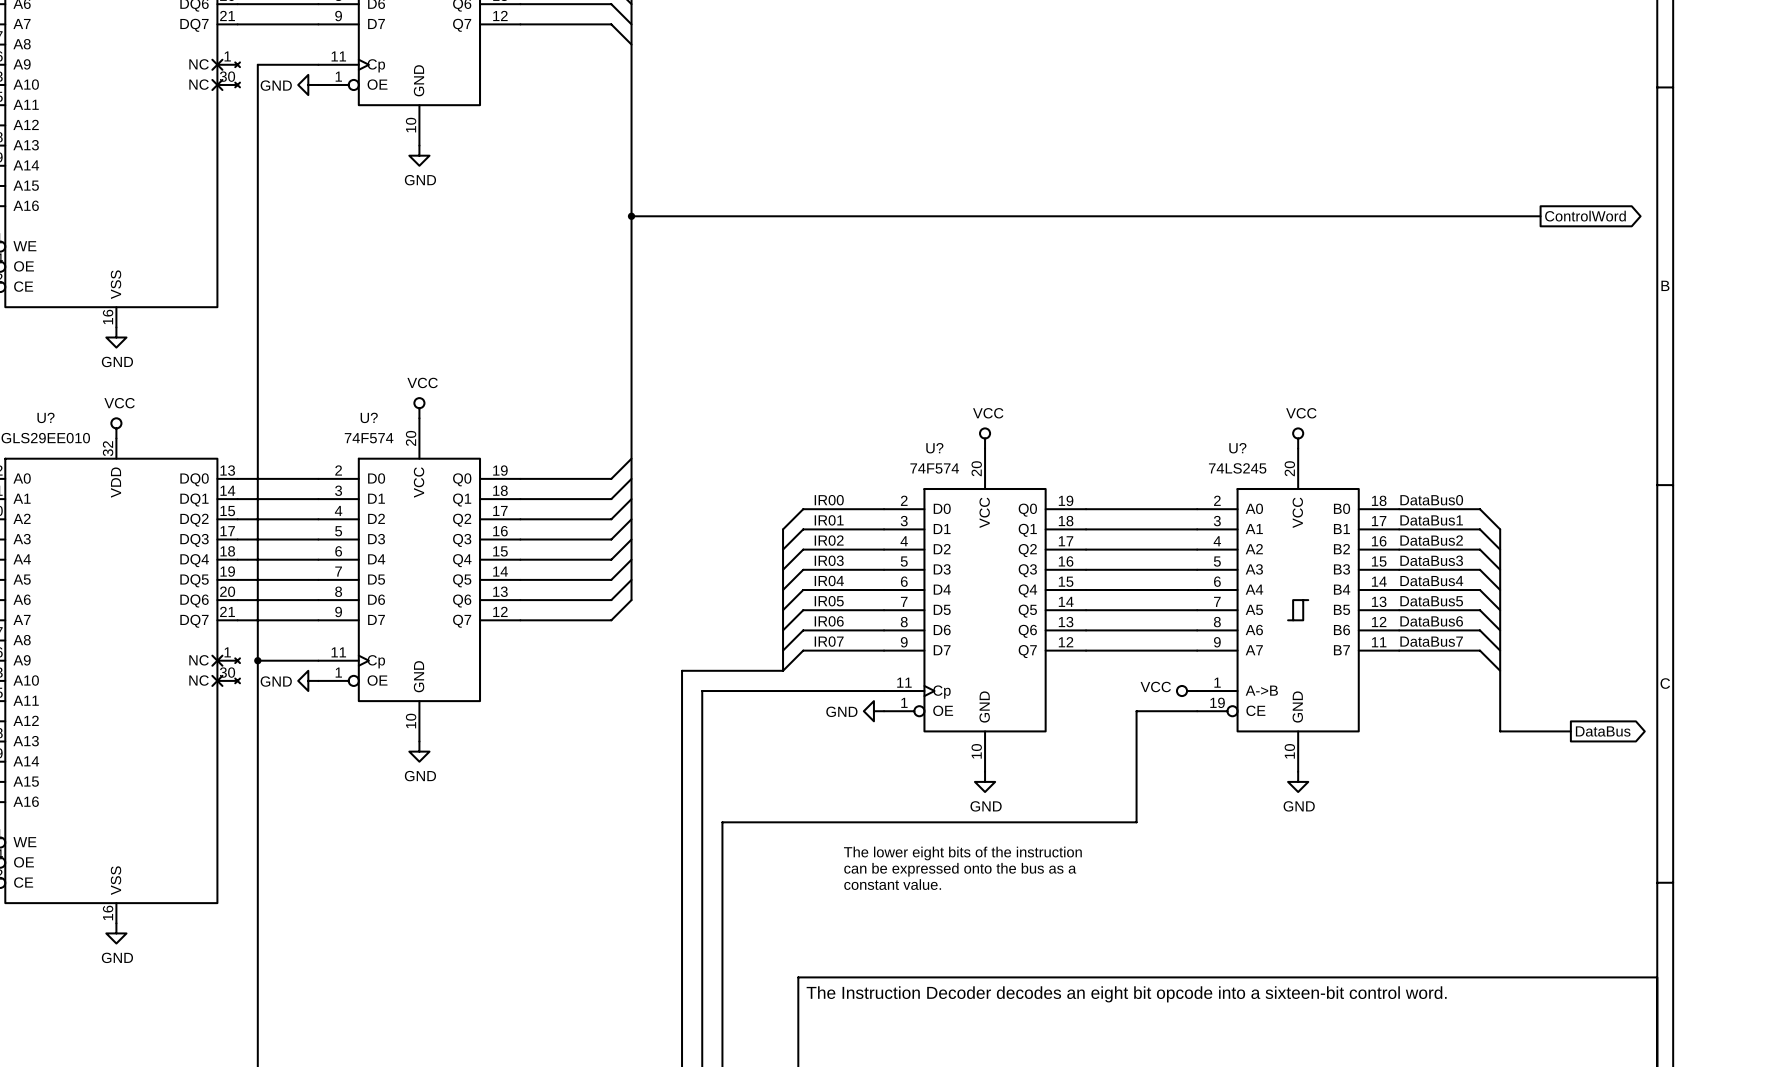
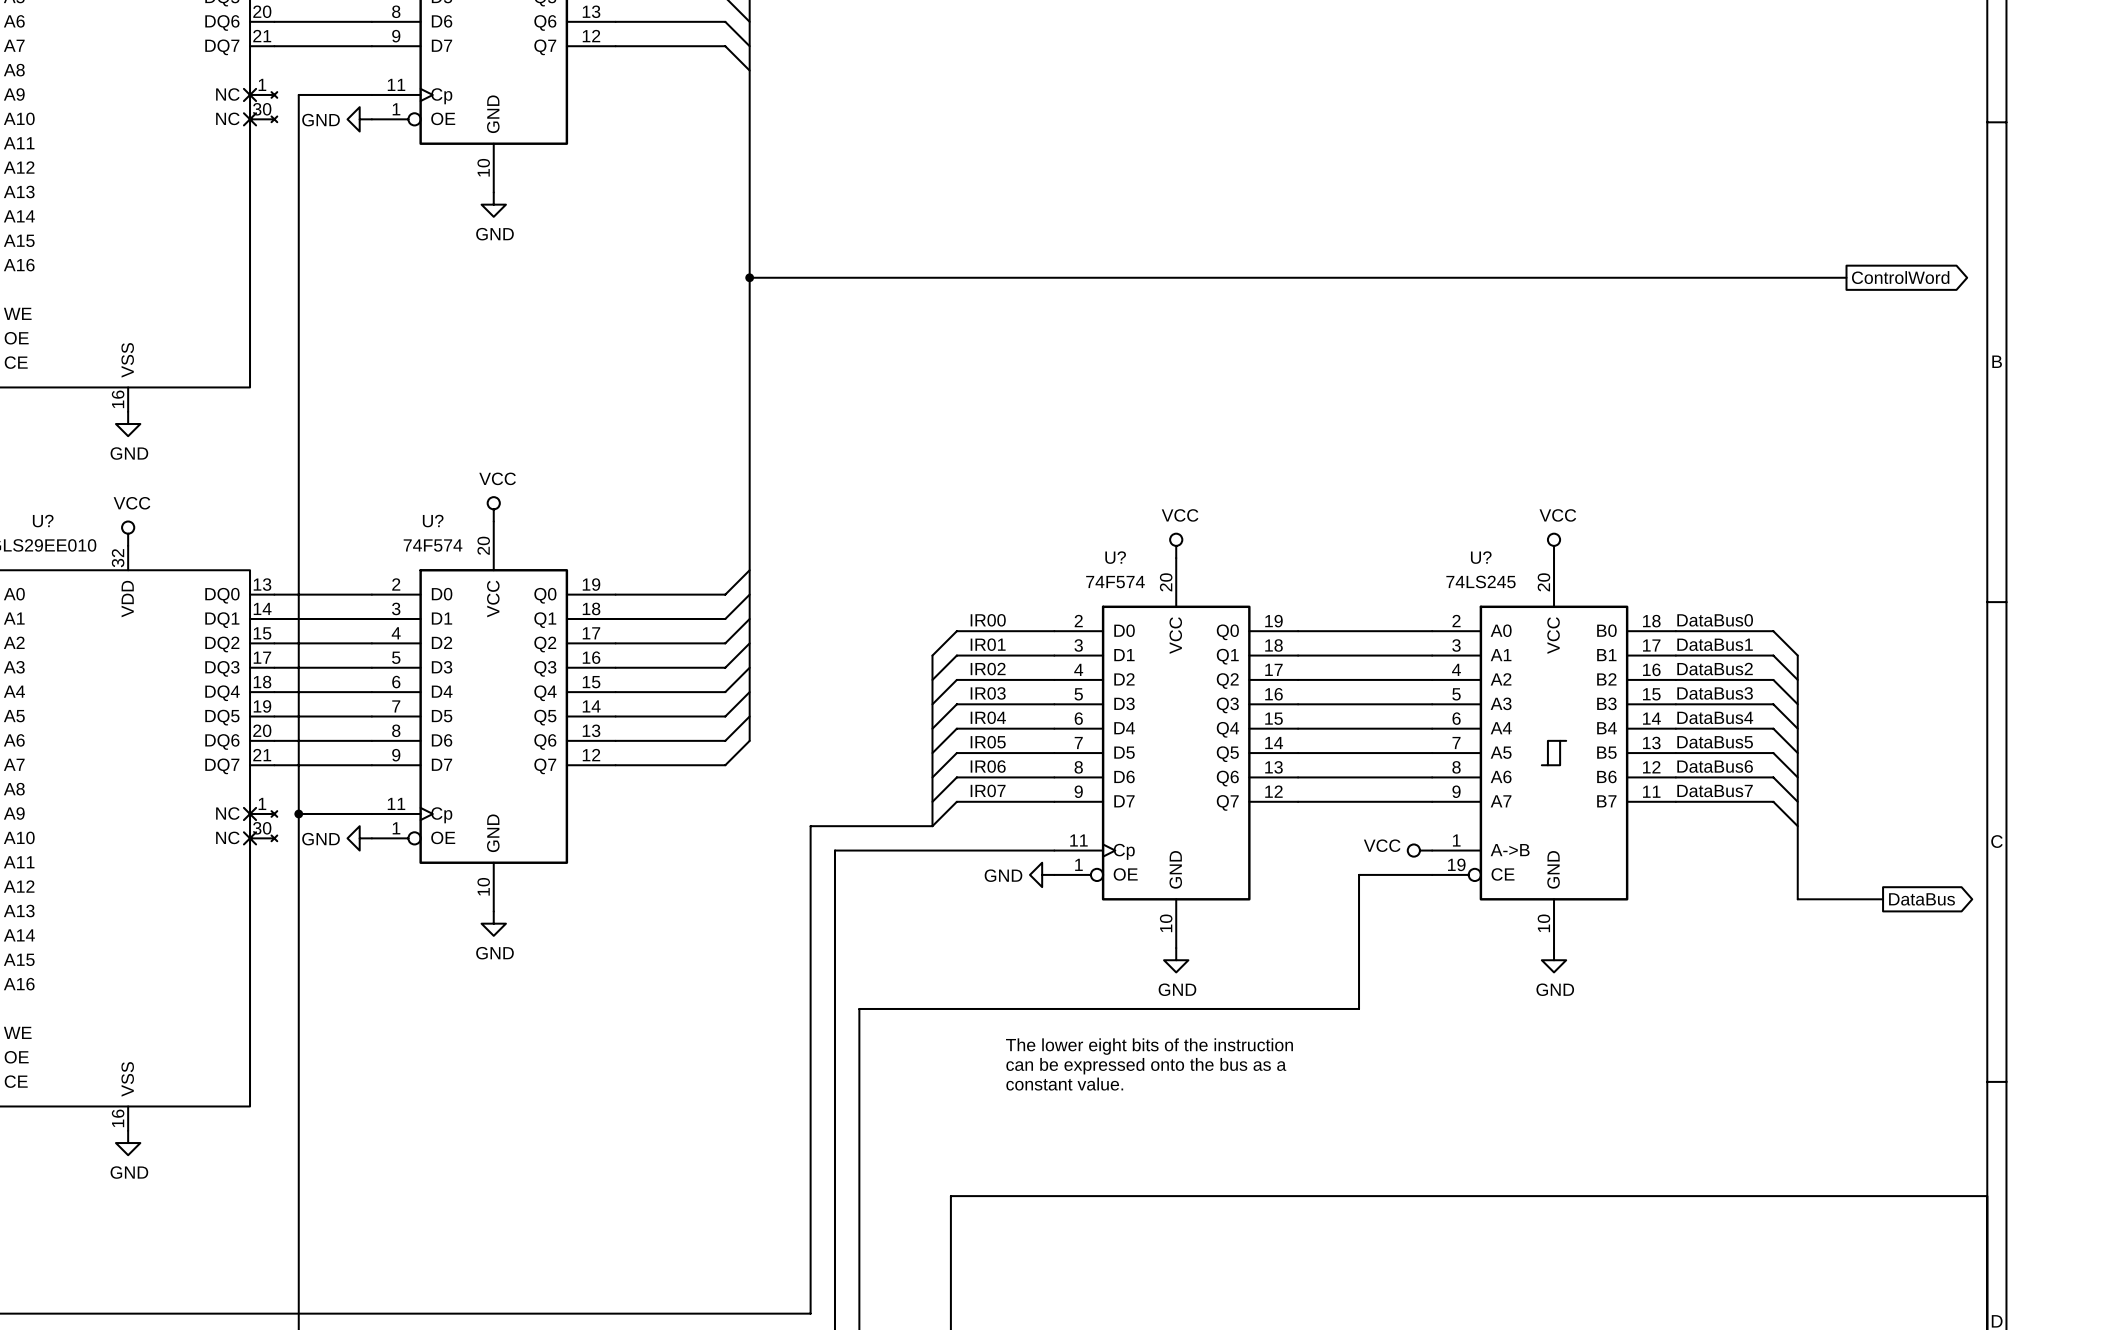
title block: The Instruction Decoder decodes an eight bit opcode into a sixteen-bit control word. (1126, 994) -> none

